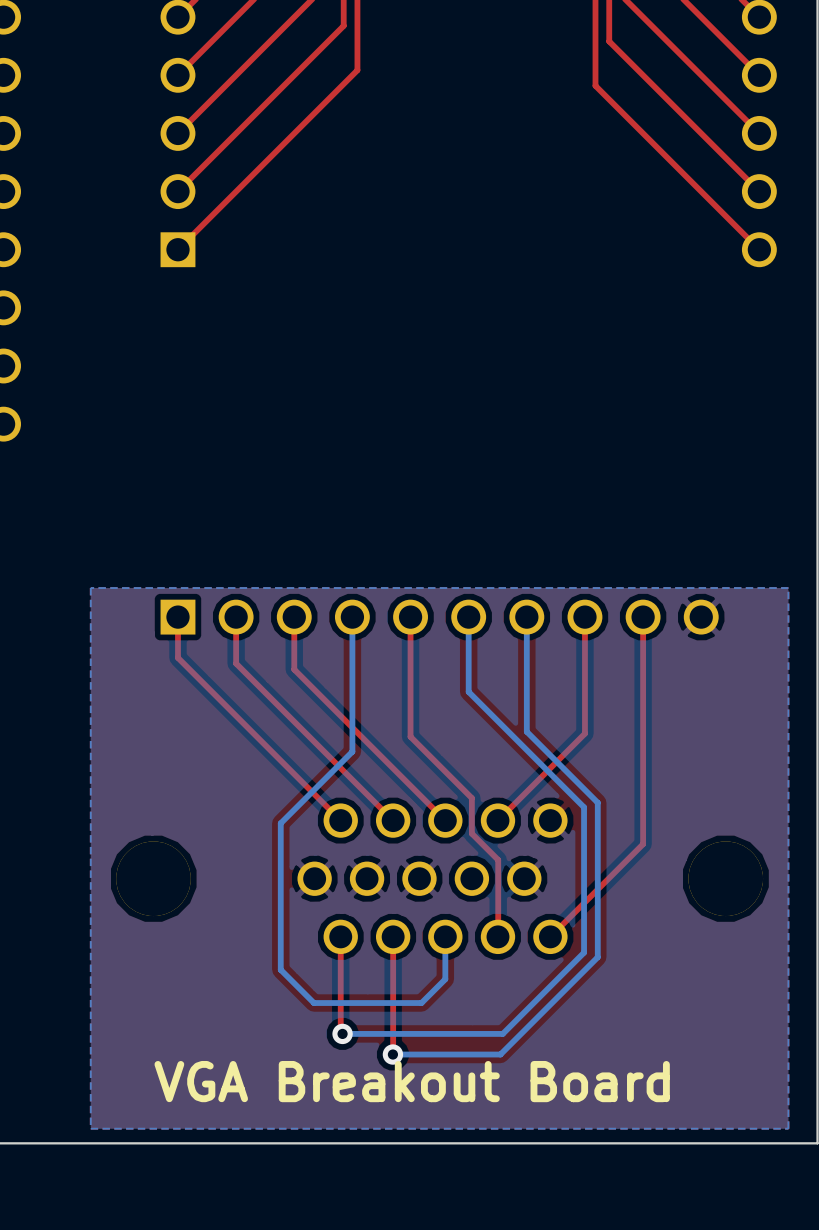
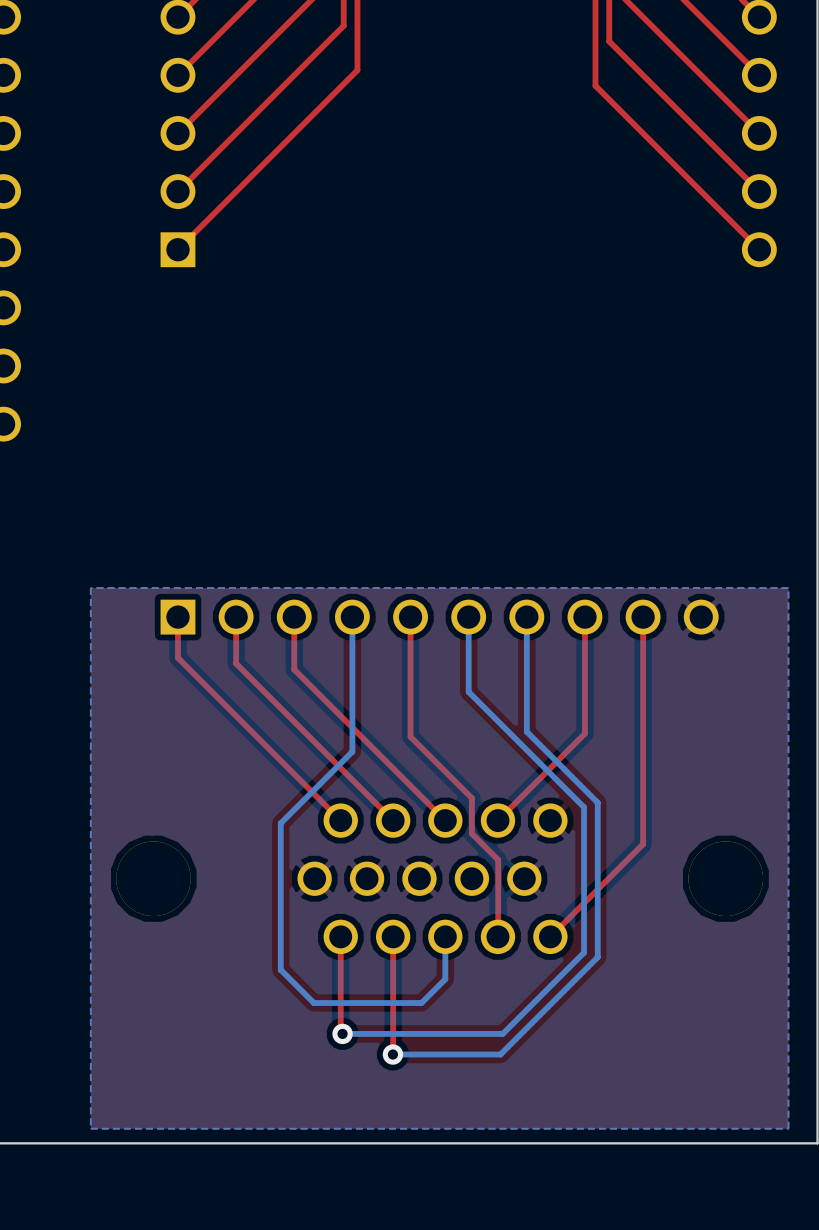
text: VGA Breakout Board (412, 1081) -> none

